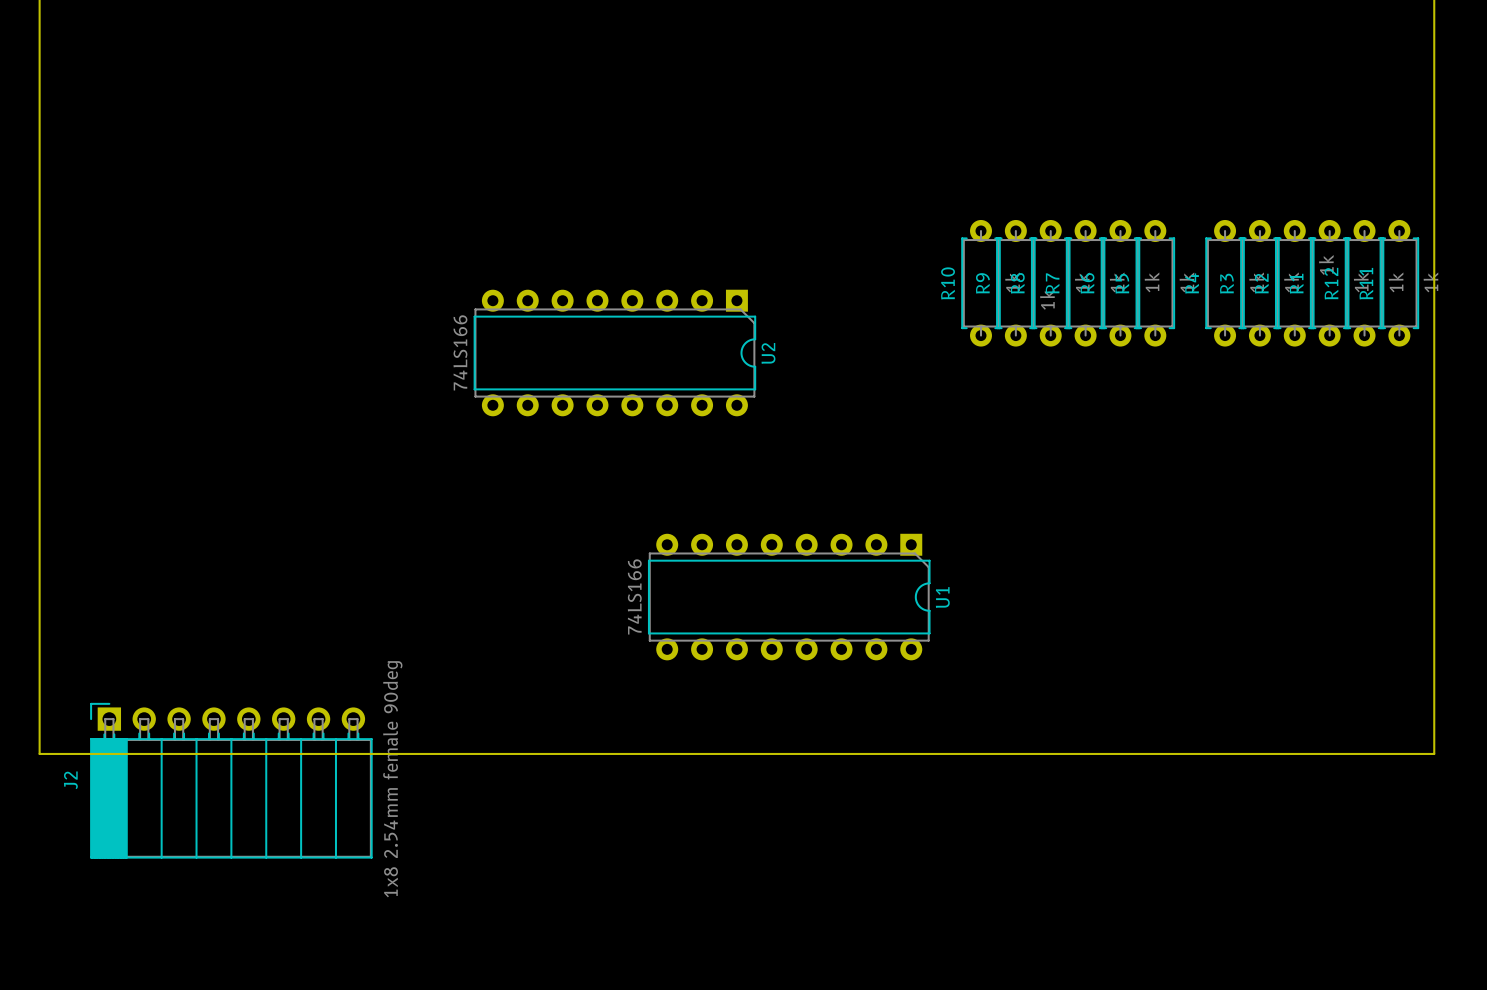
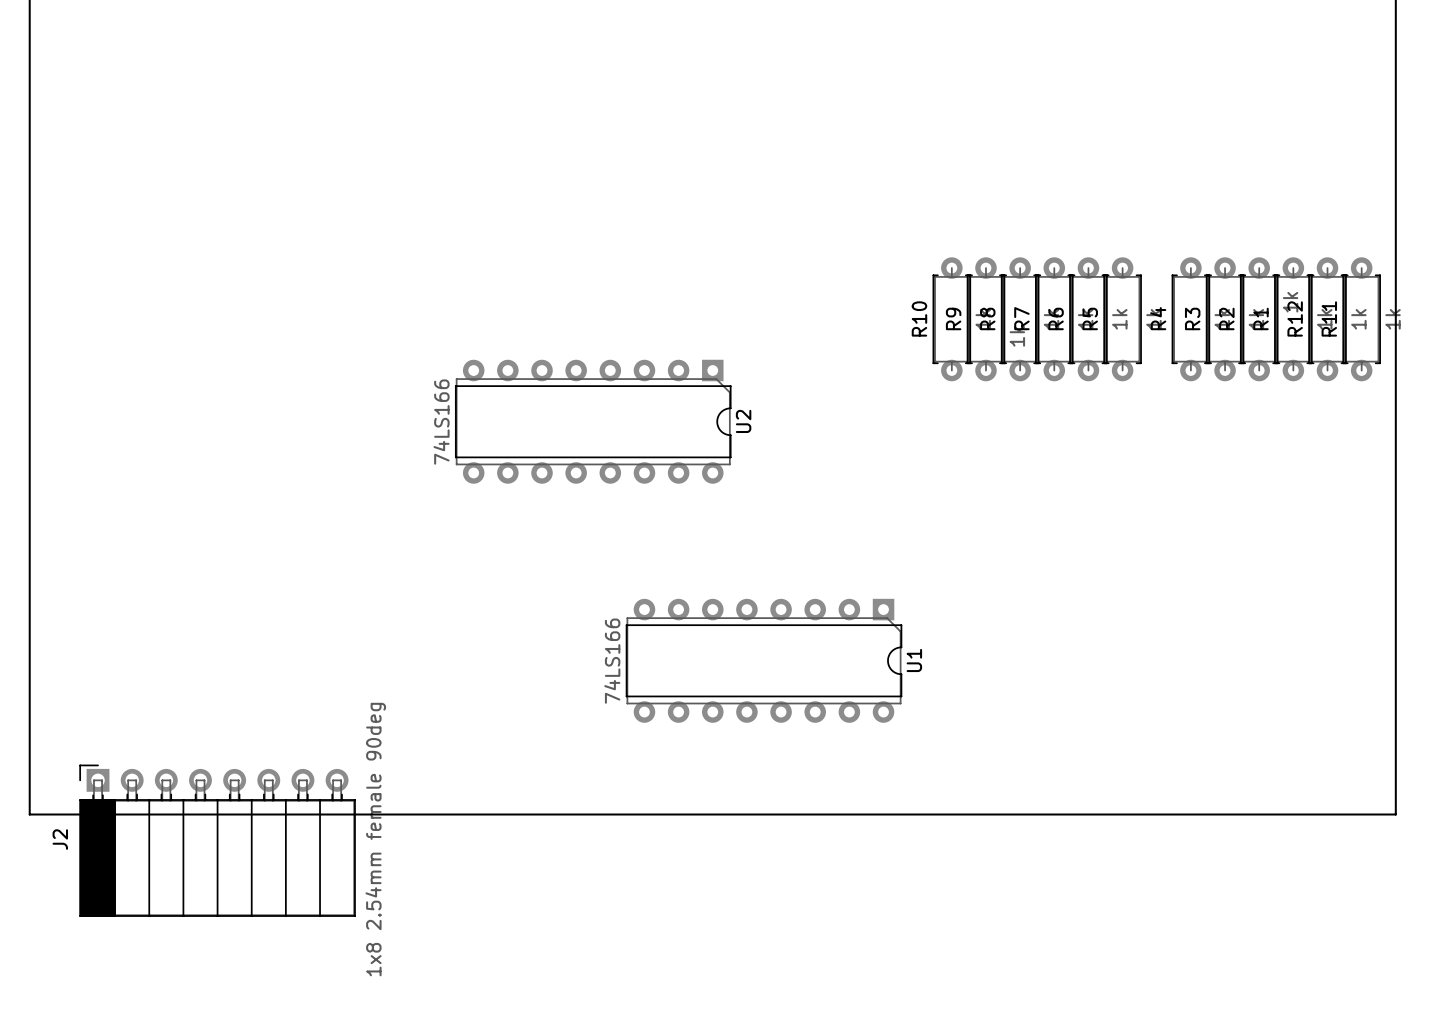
U2 position: (614, 353) -> (593, 421)
U1 position: (789, 597) -> (764, 660)
board edge: (39, 753) (1434, 753) -> (29, 780) (29, 814) (1395, 814) (1395, 780)
J2 position: (231, 780) -> (217, 840)

